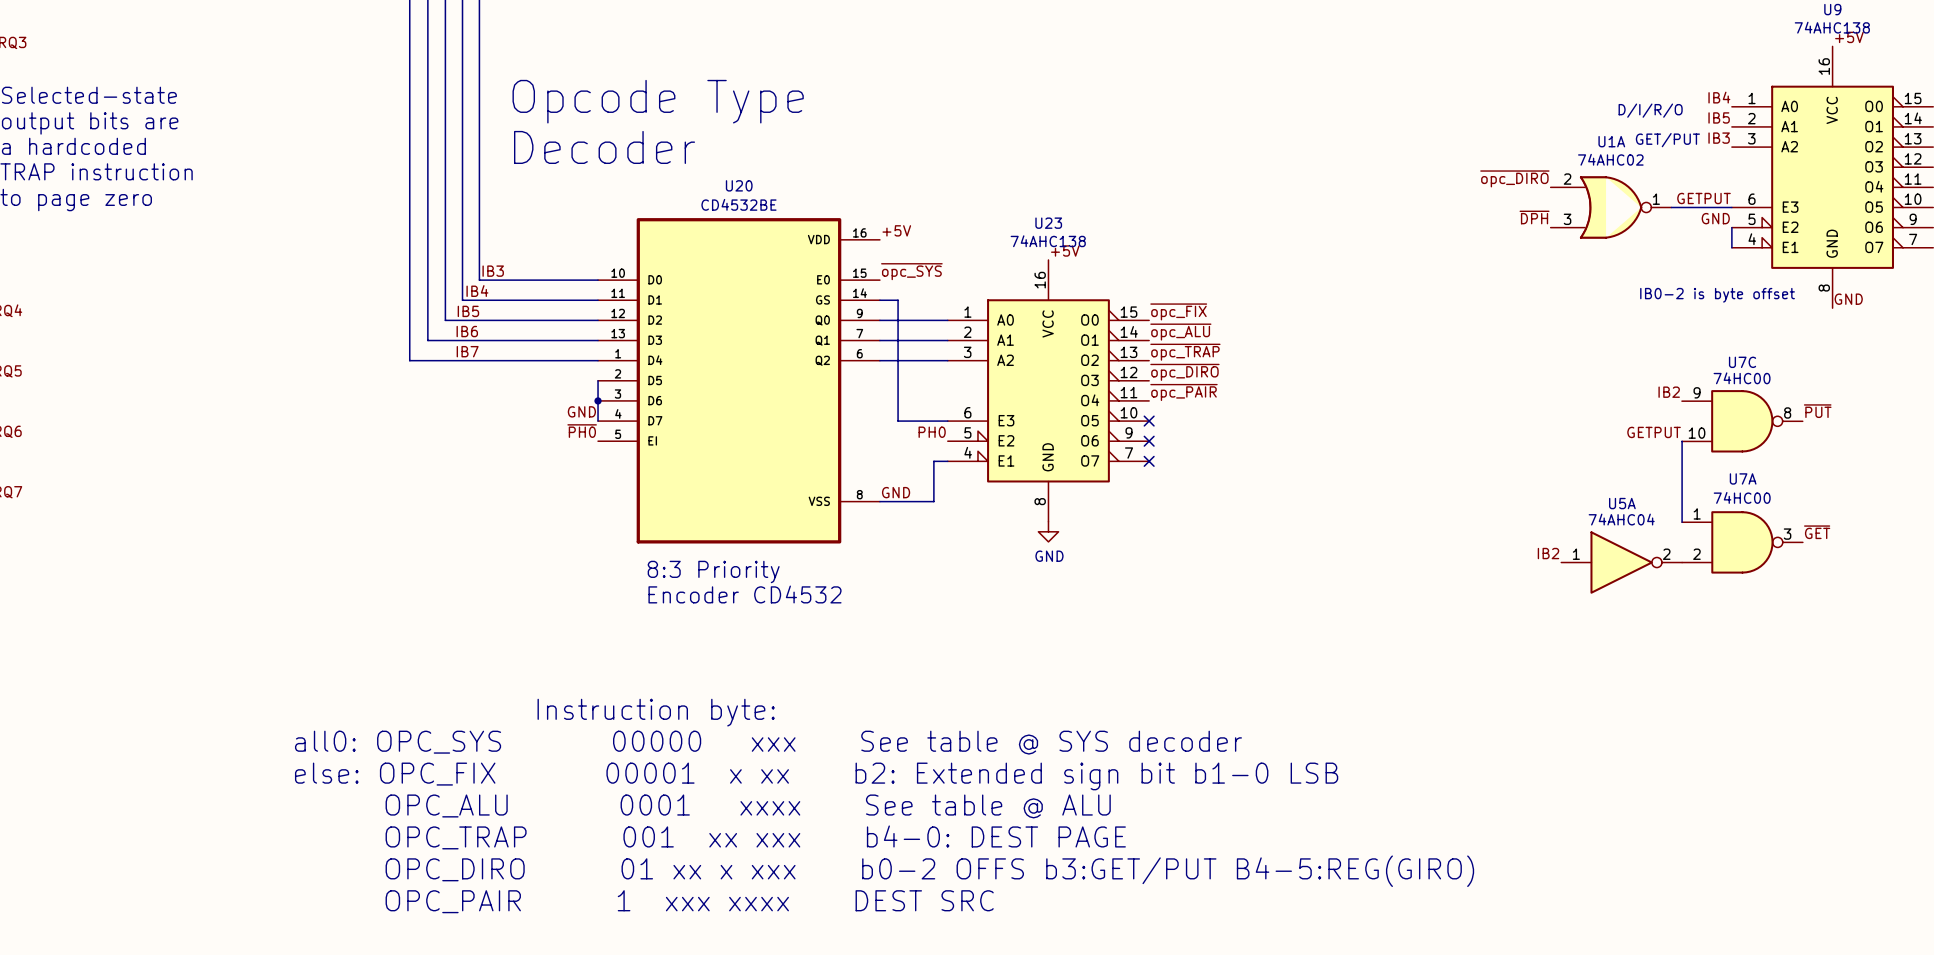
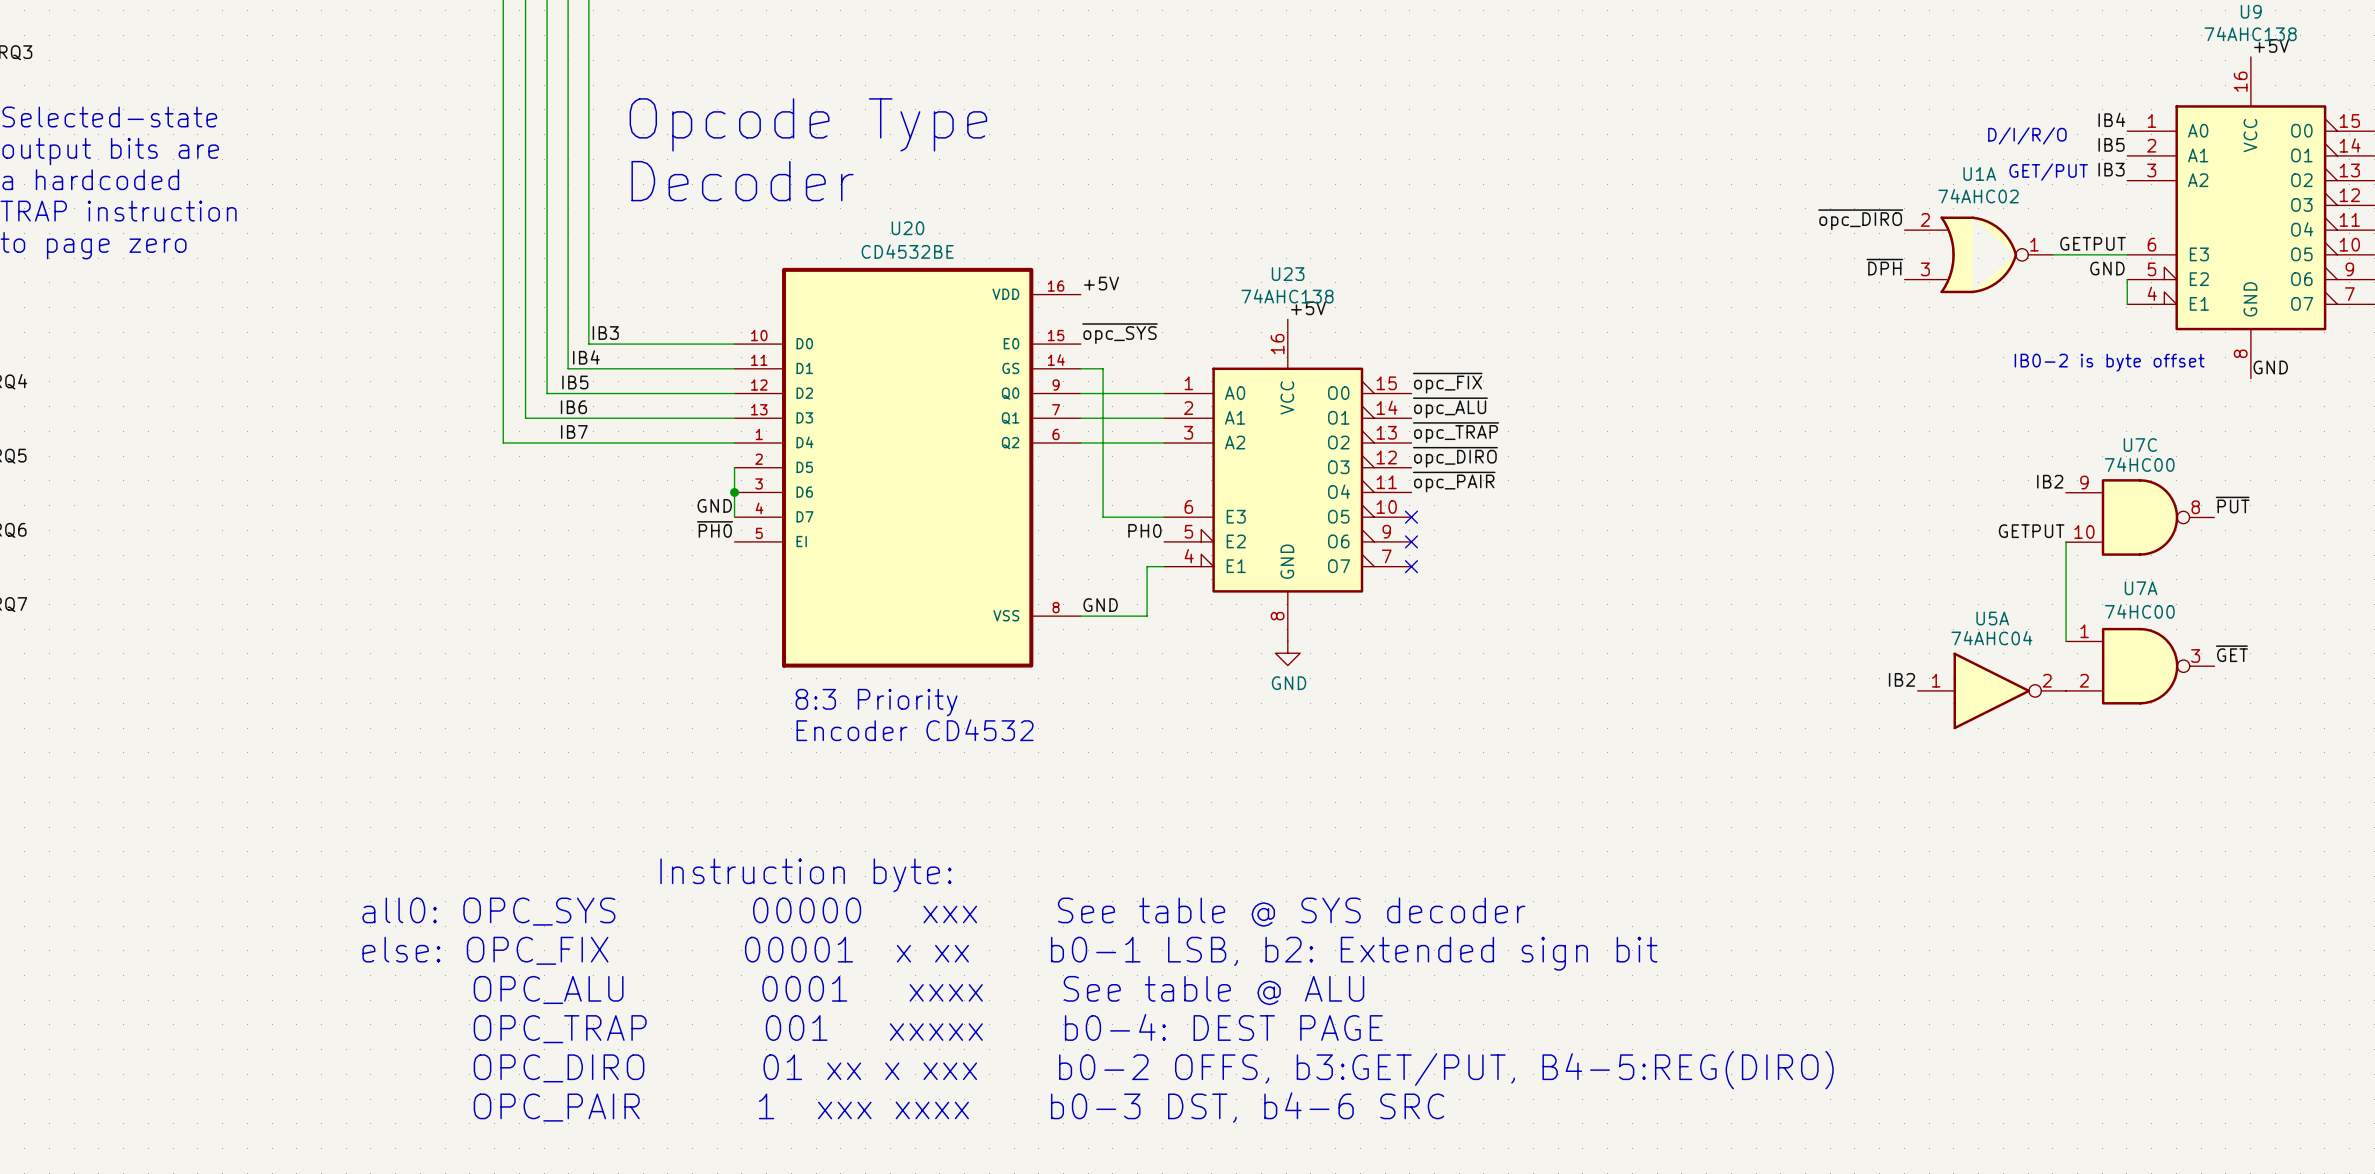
text: else: OPC_FIX 00001 x xx b2: Extended sign bit b1-0 LSB (816, 776) -> else: OPC_FIX 00001 x xx b0-1 LSB, b2: Extended sign bit (1009, 953)
text: OPC_TRAP 001 xx xxx b4-0: DEST PAGE (755, 837) -> OPC_TRAP 001 xxxxx b0-4: DEST PAGE (928, 1028)
text: OPC_DIRO 01 xx x xxx b0-2 OFFS b3:GET/PUT B4-5:REG(GIRO) (929, 871) -> OPC_DIRO 01 xx x xxx b0-2 OFFS, b3:GET/PUT, B4-5:REG(DIRO) (1153, 1070)
text: OPC_PAIR 1 xxx xxxx DEST SRC (689, 901) -> OPC_PAIR 1 xxx xxxx b0-3 DST, b4-6 SRC (958, 1107)

